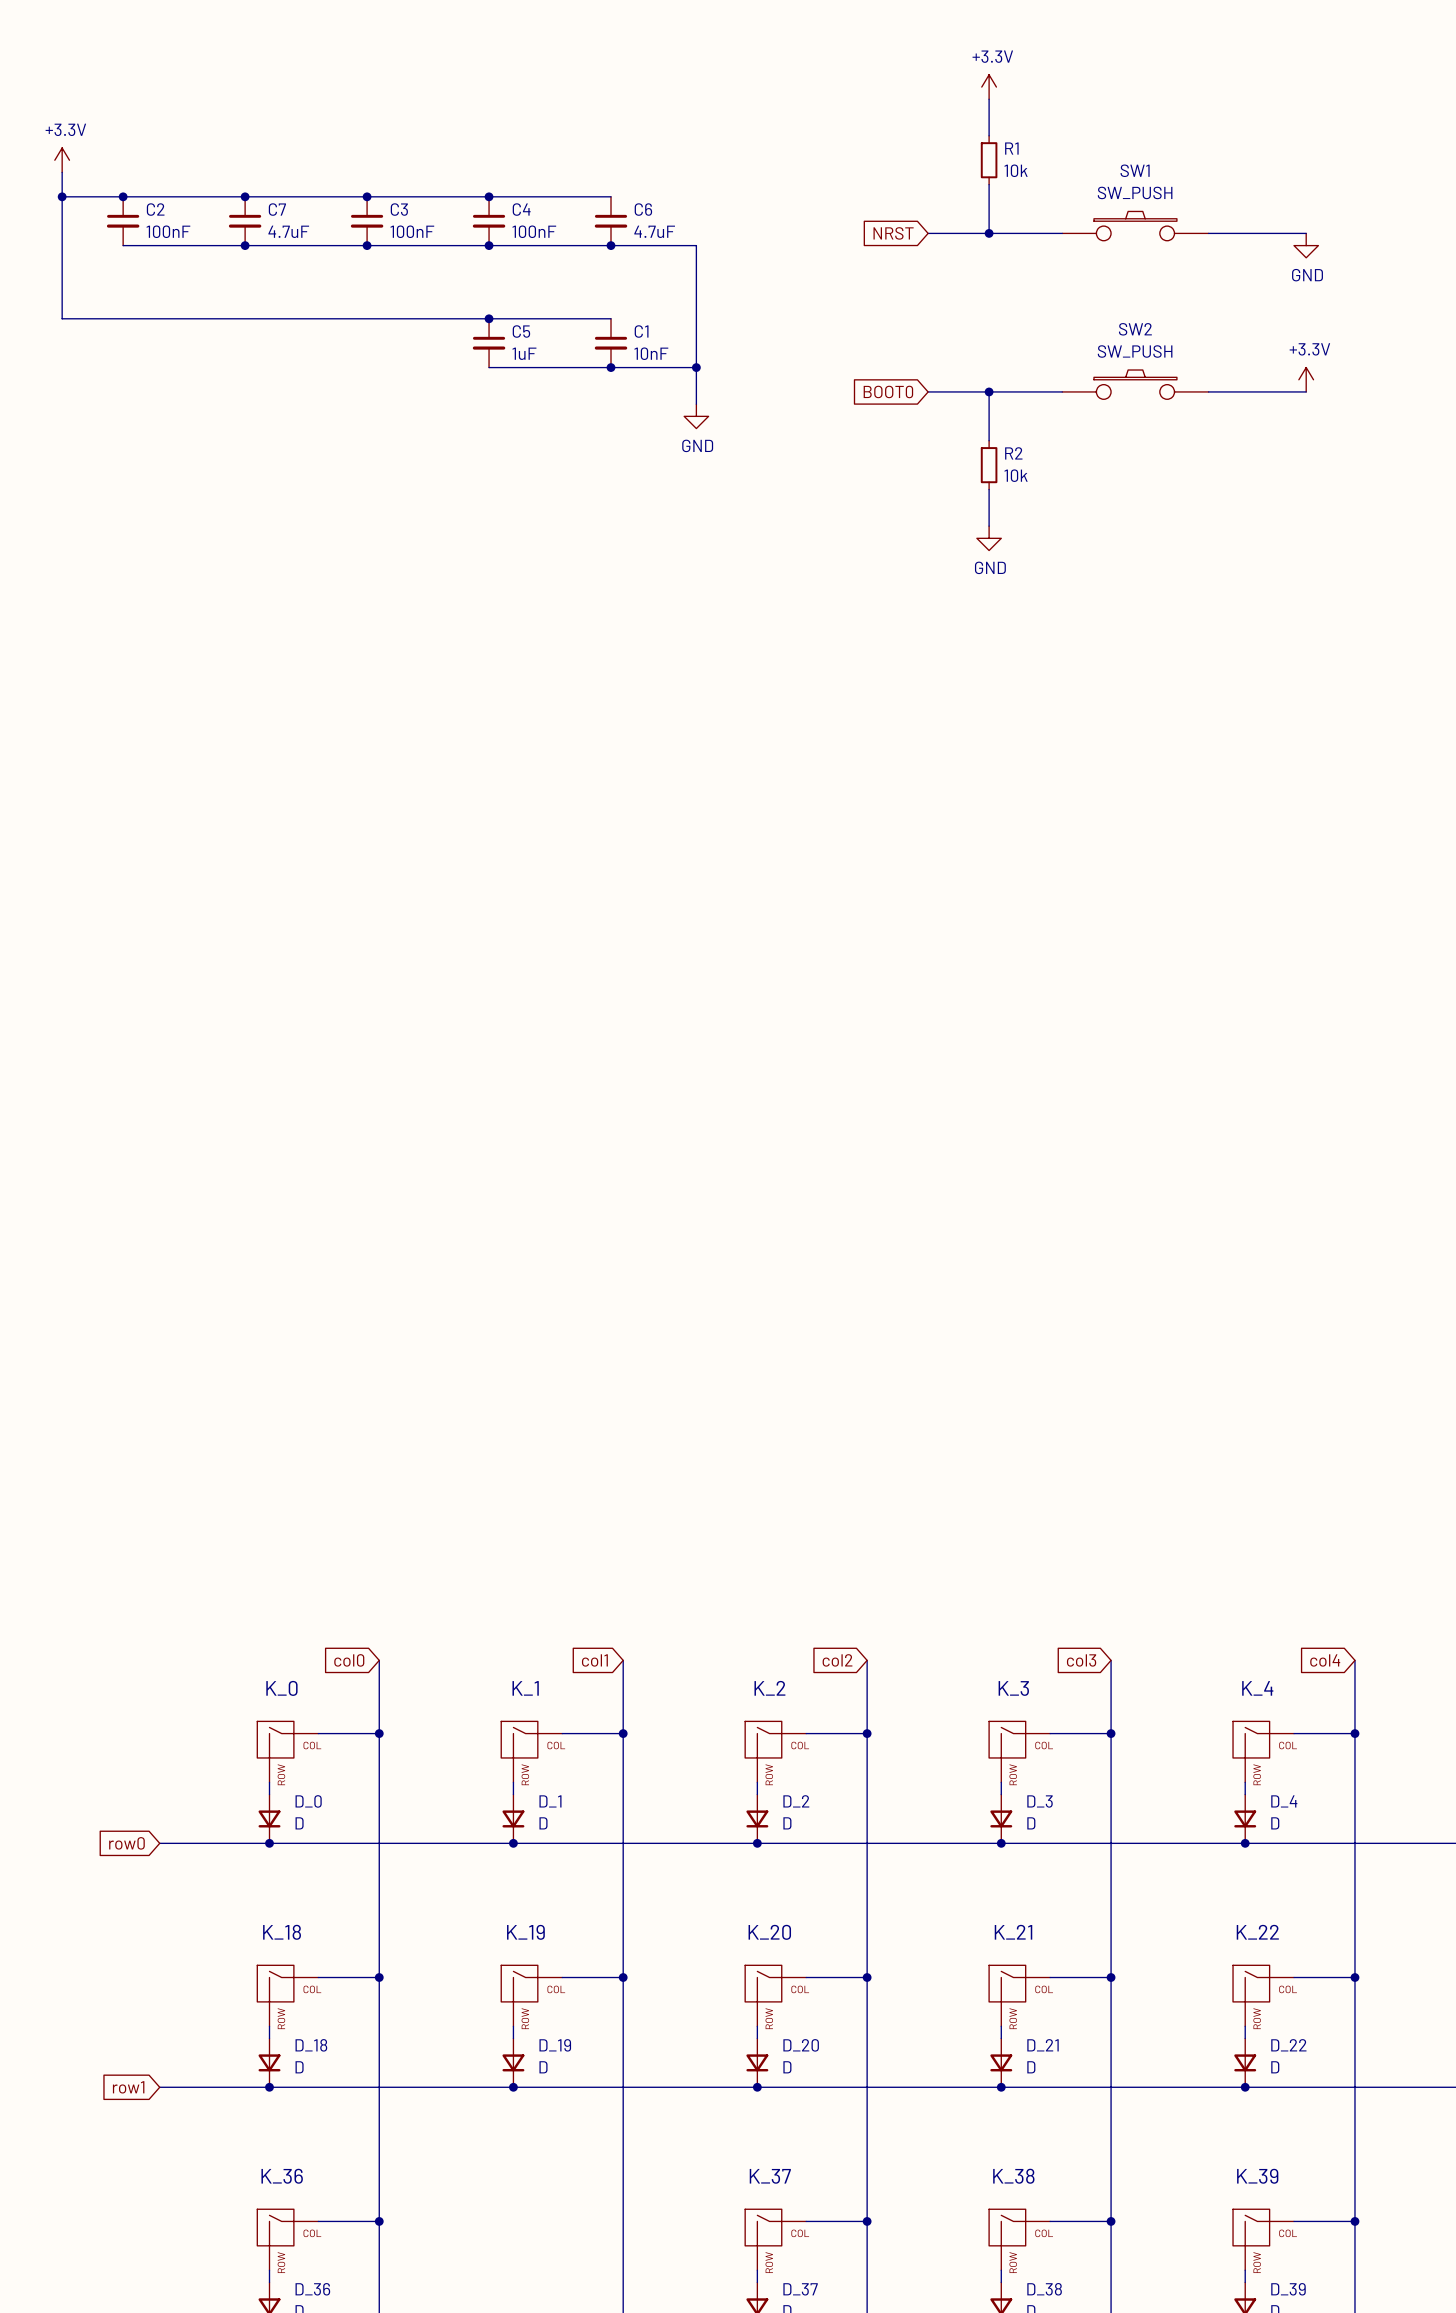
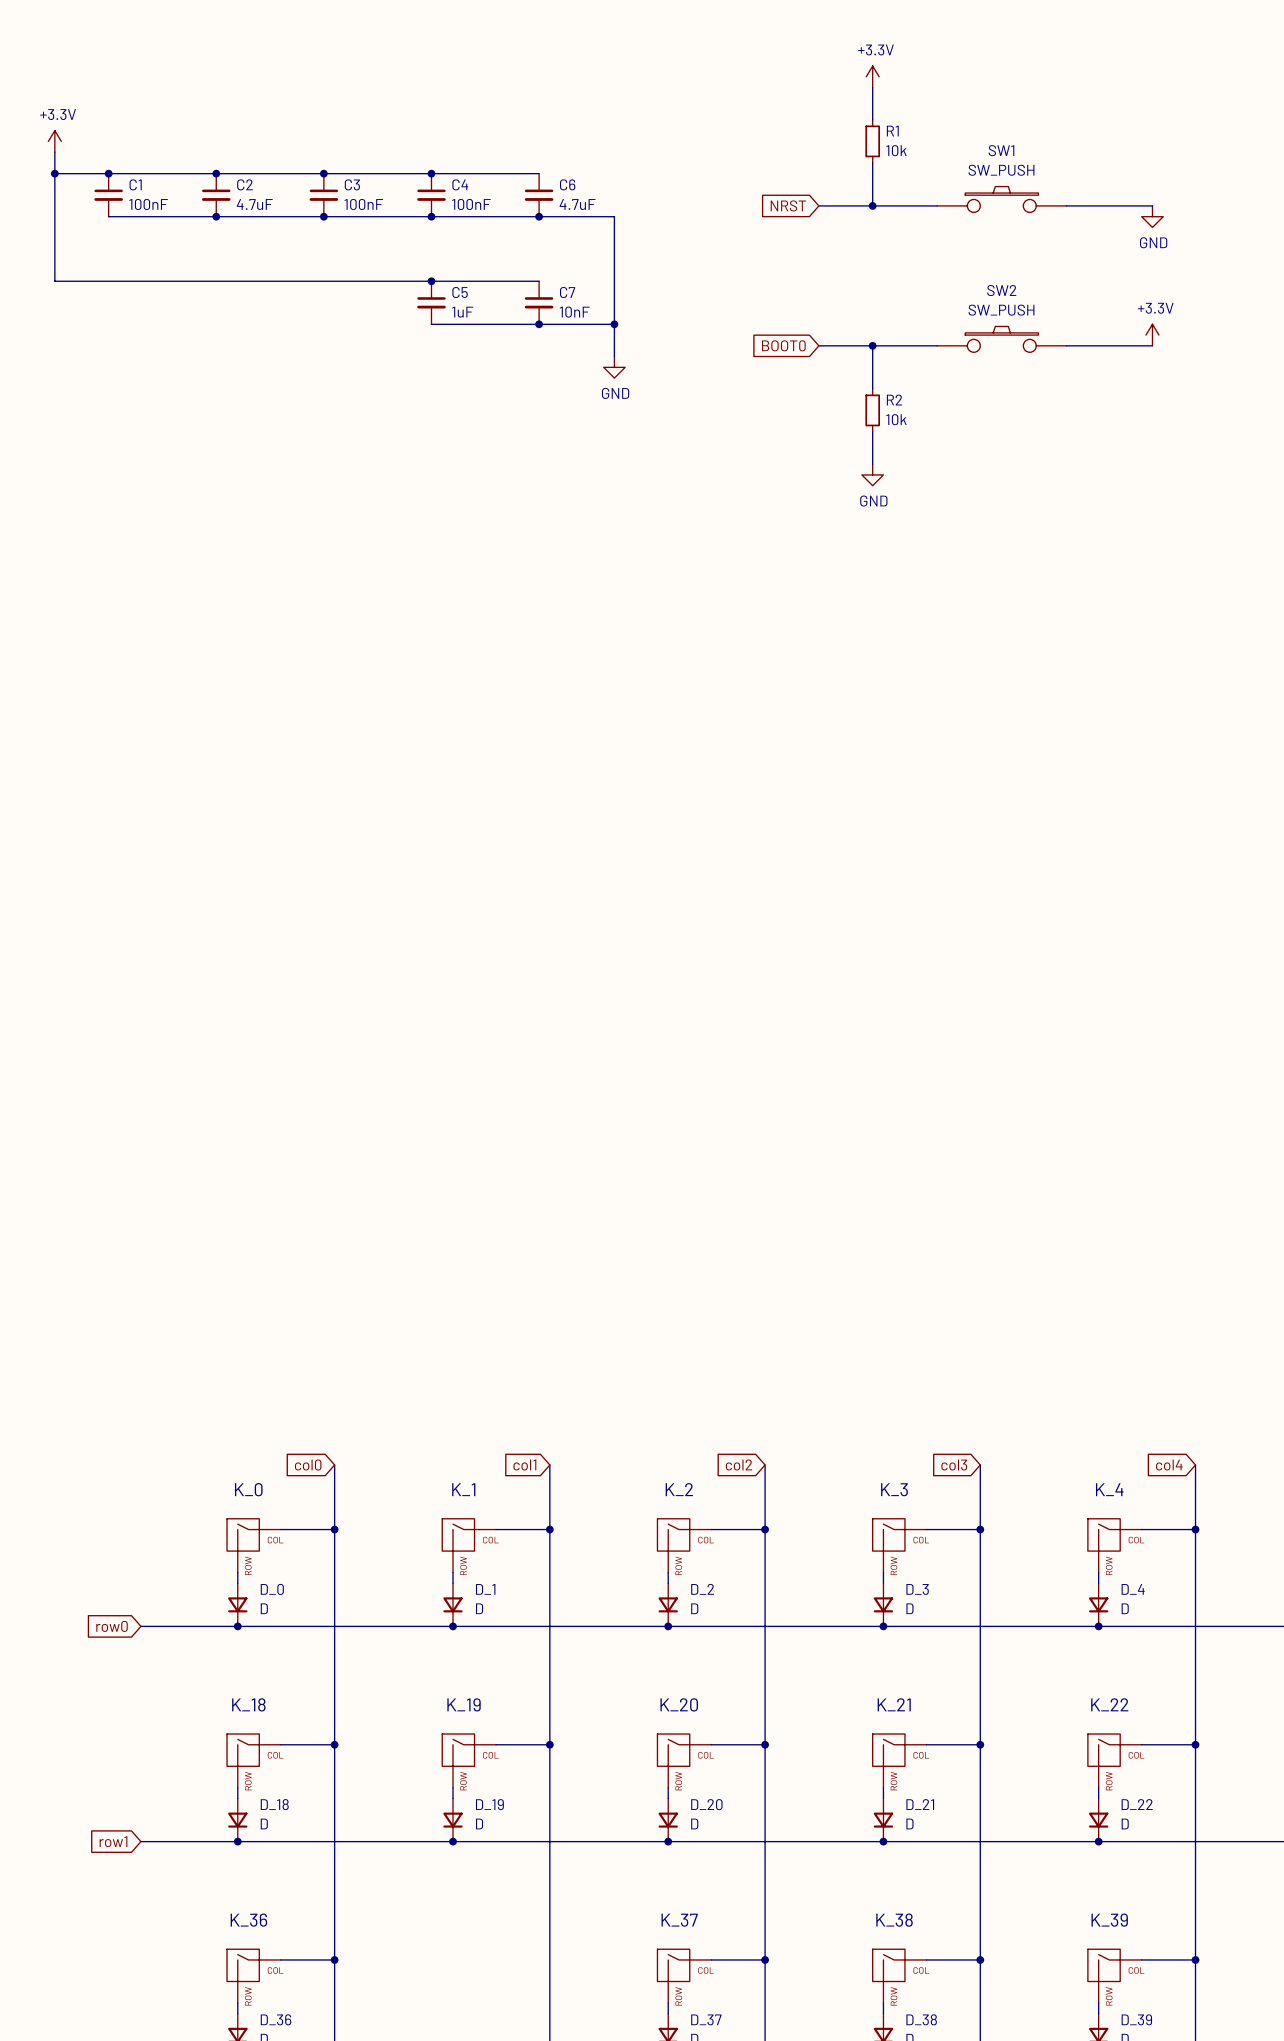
C2 name: C2 (155, 209) -> C1 (135, 184)
C7 name: C7 (277, 209) -> C2 (244, 184)
C1 name: C1 (641, 331) -> C7 (567, 292)

